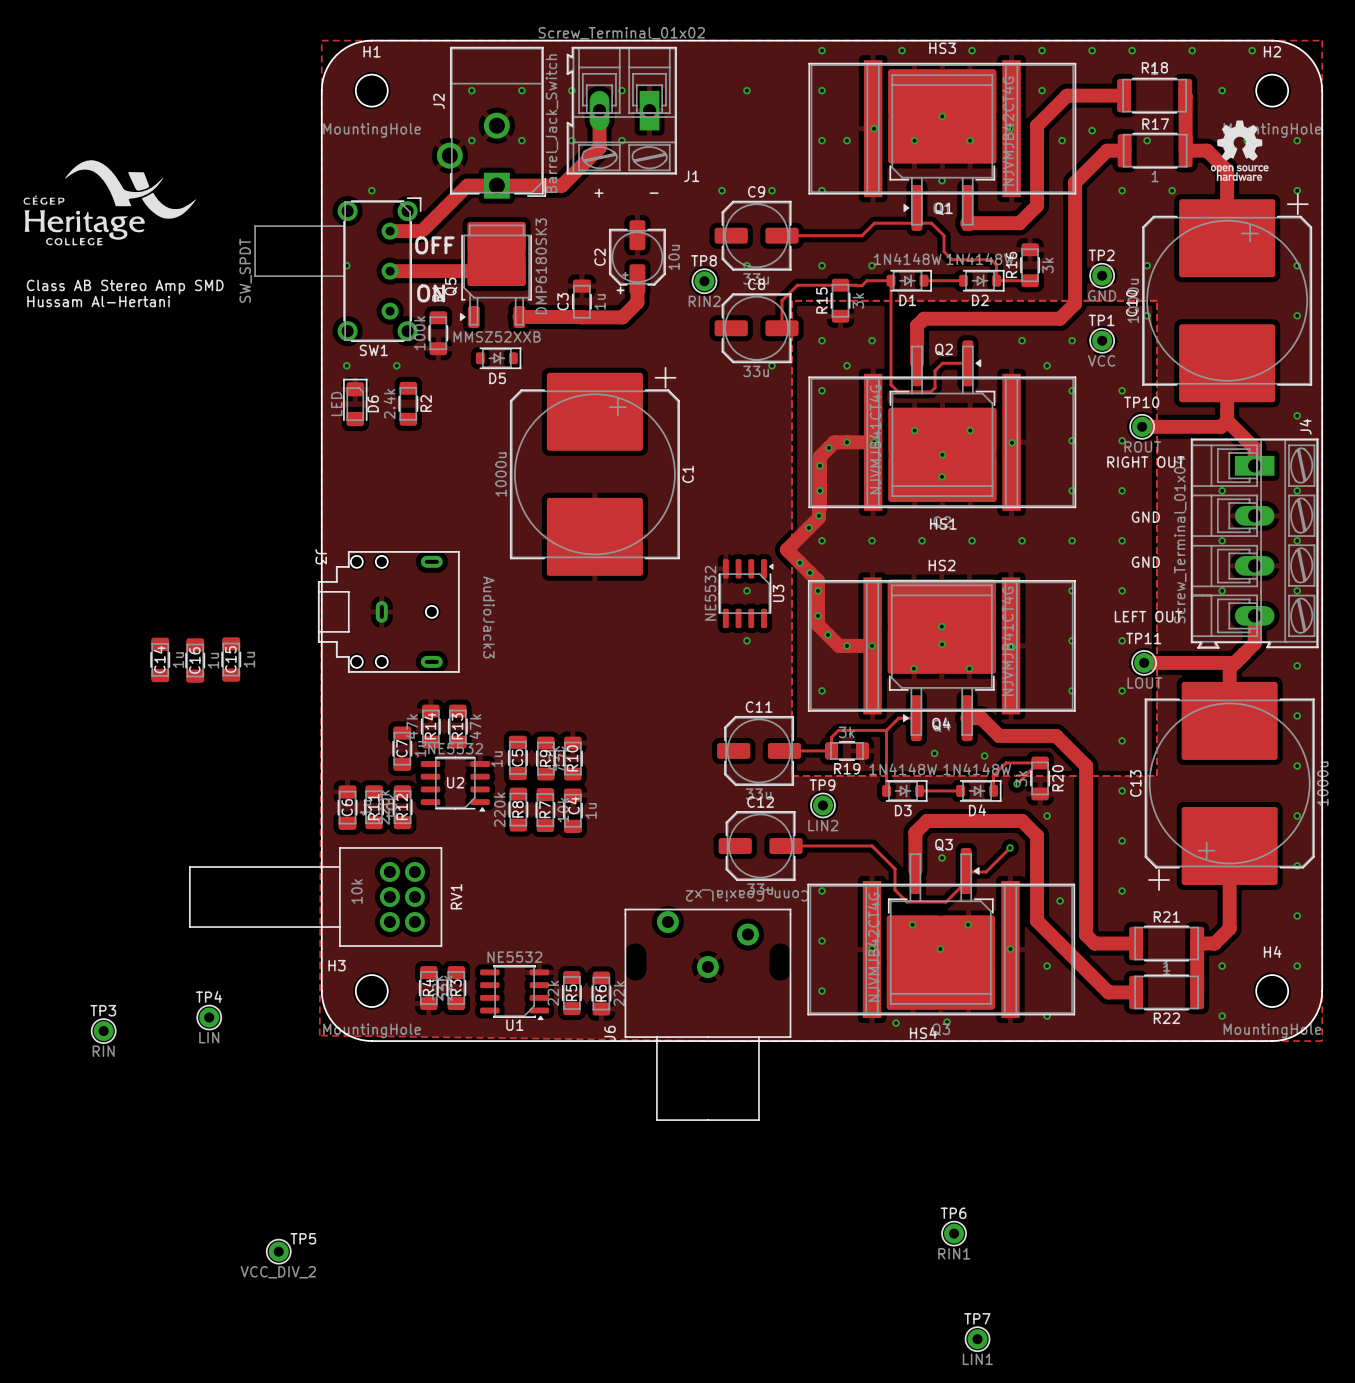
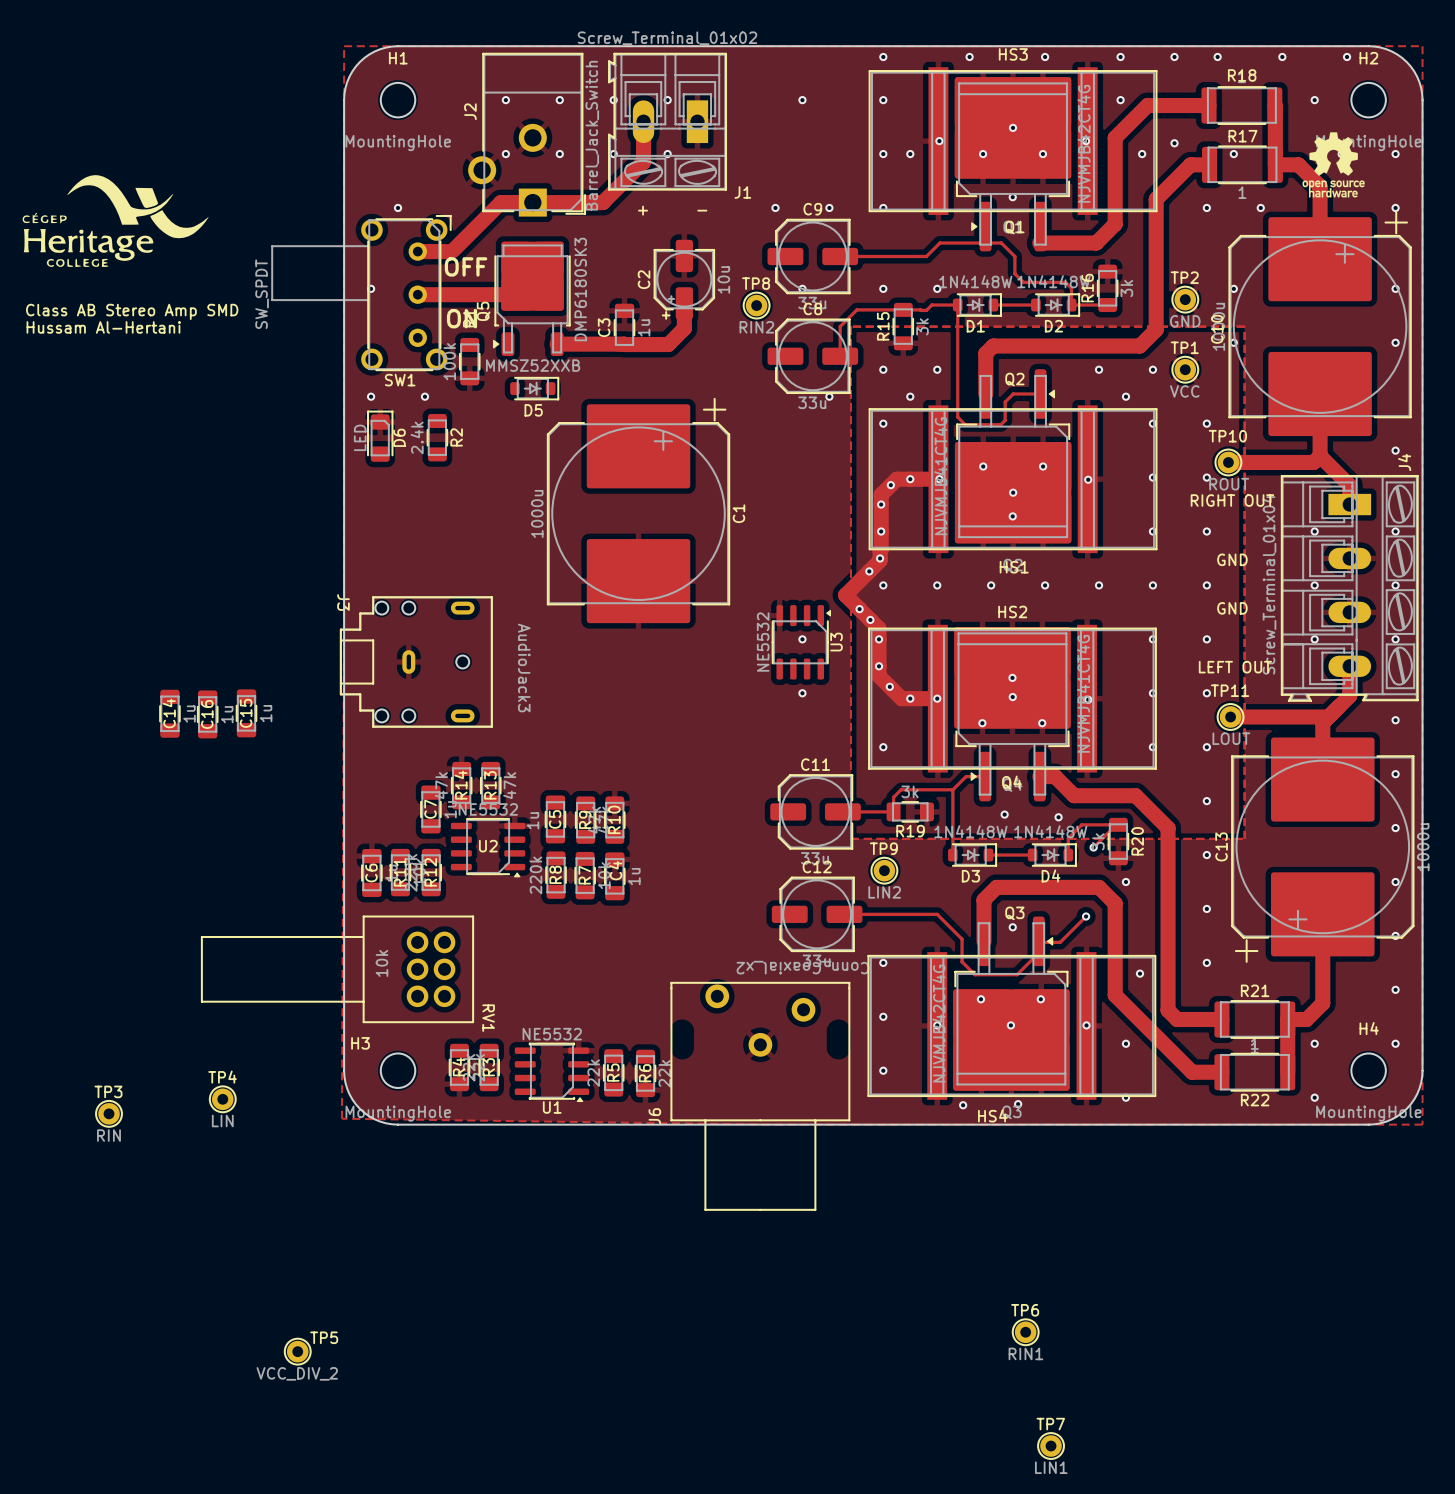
RV1 name rotation: 0° (456, 896) -> 180° (488, 1018)
RV1 name position: RV1 (456, 896) -> RV1 (488, 1018)

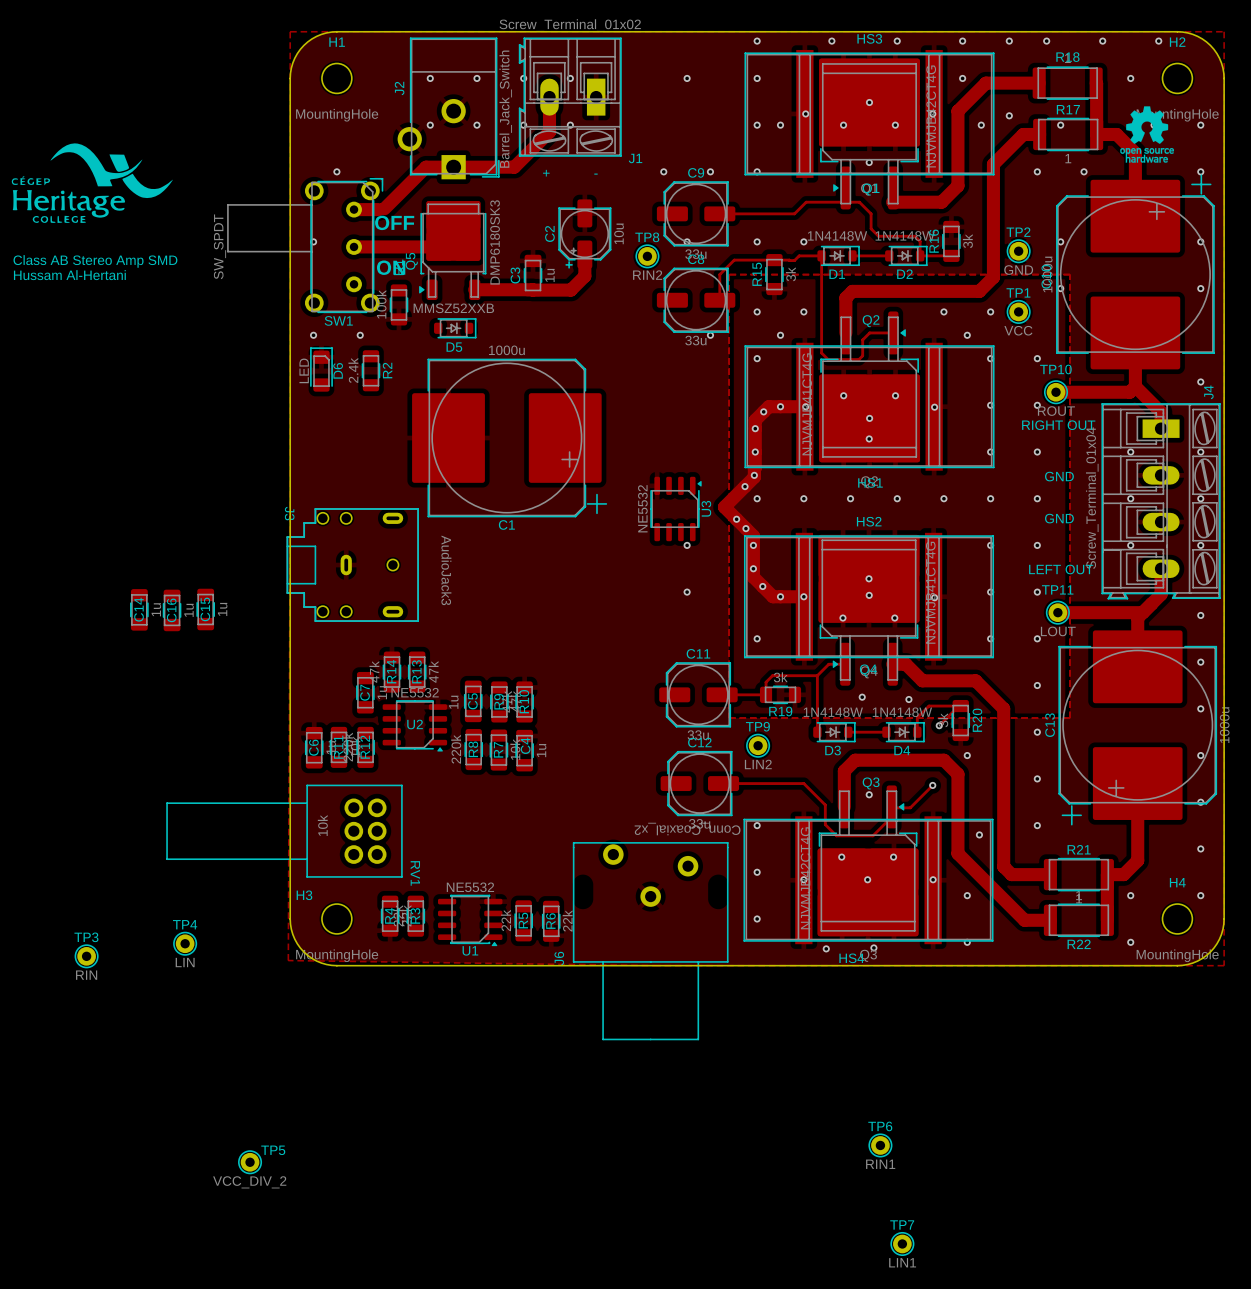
C1 rotation: 0° (638, 510) -> 90° clockwise (509, 438)
U3 position: (801, 642) -> (676, 508)

